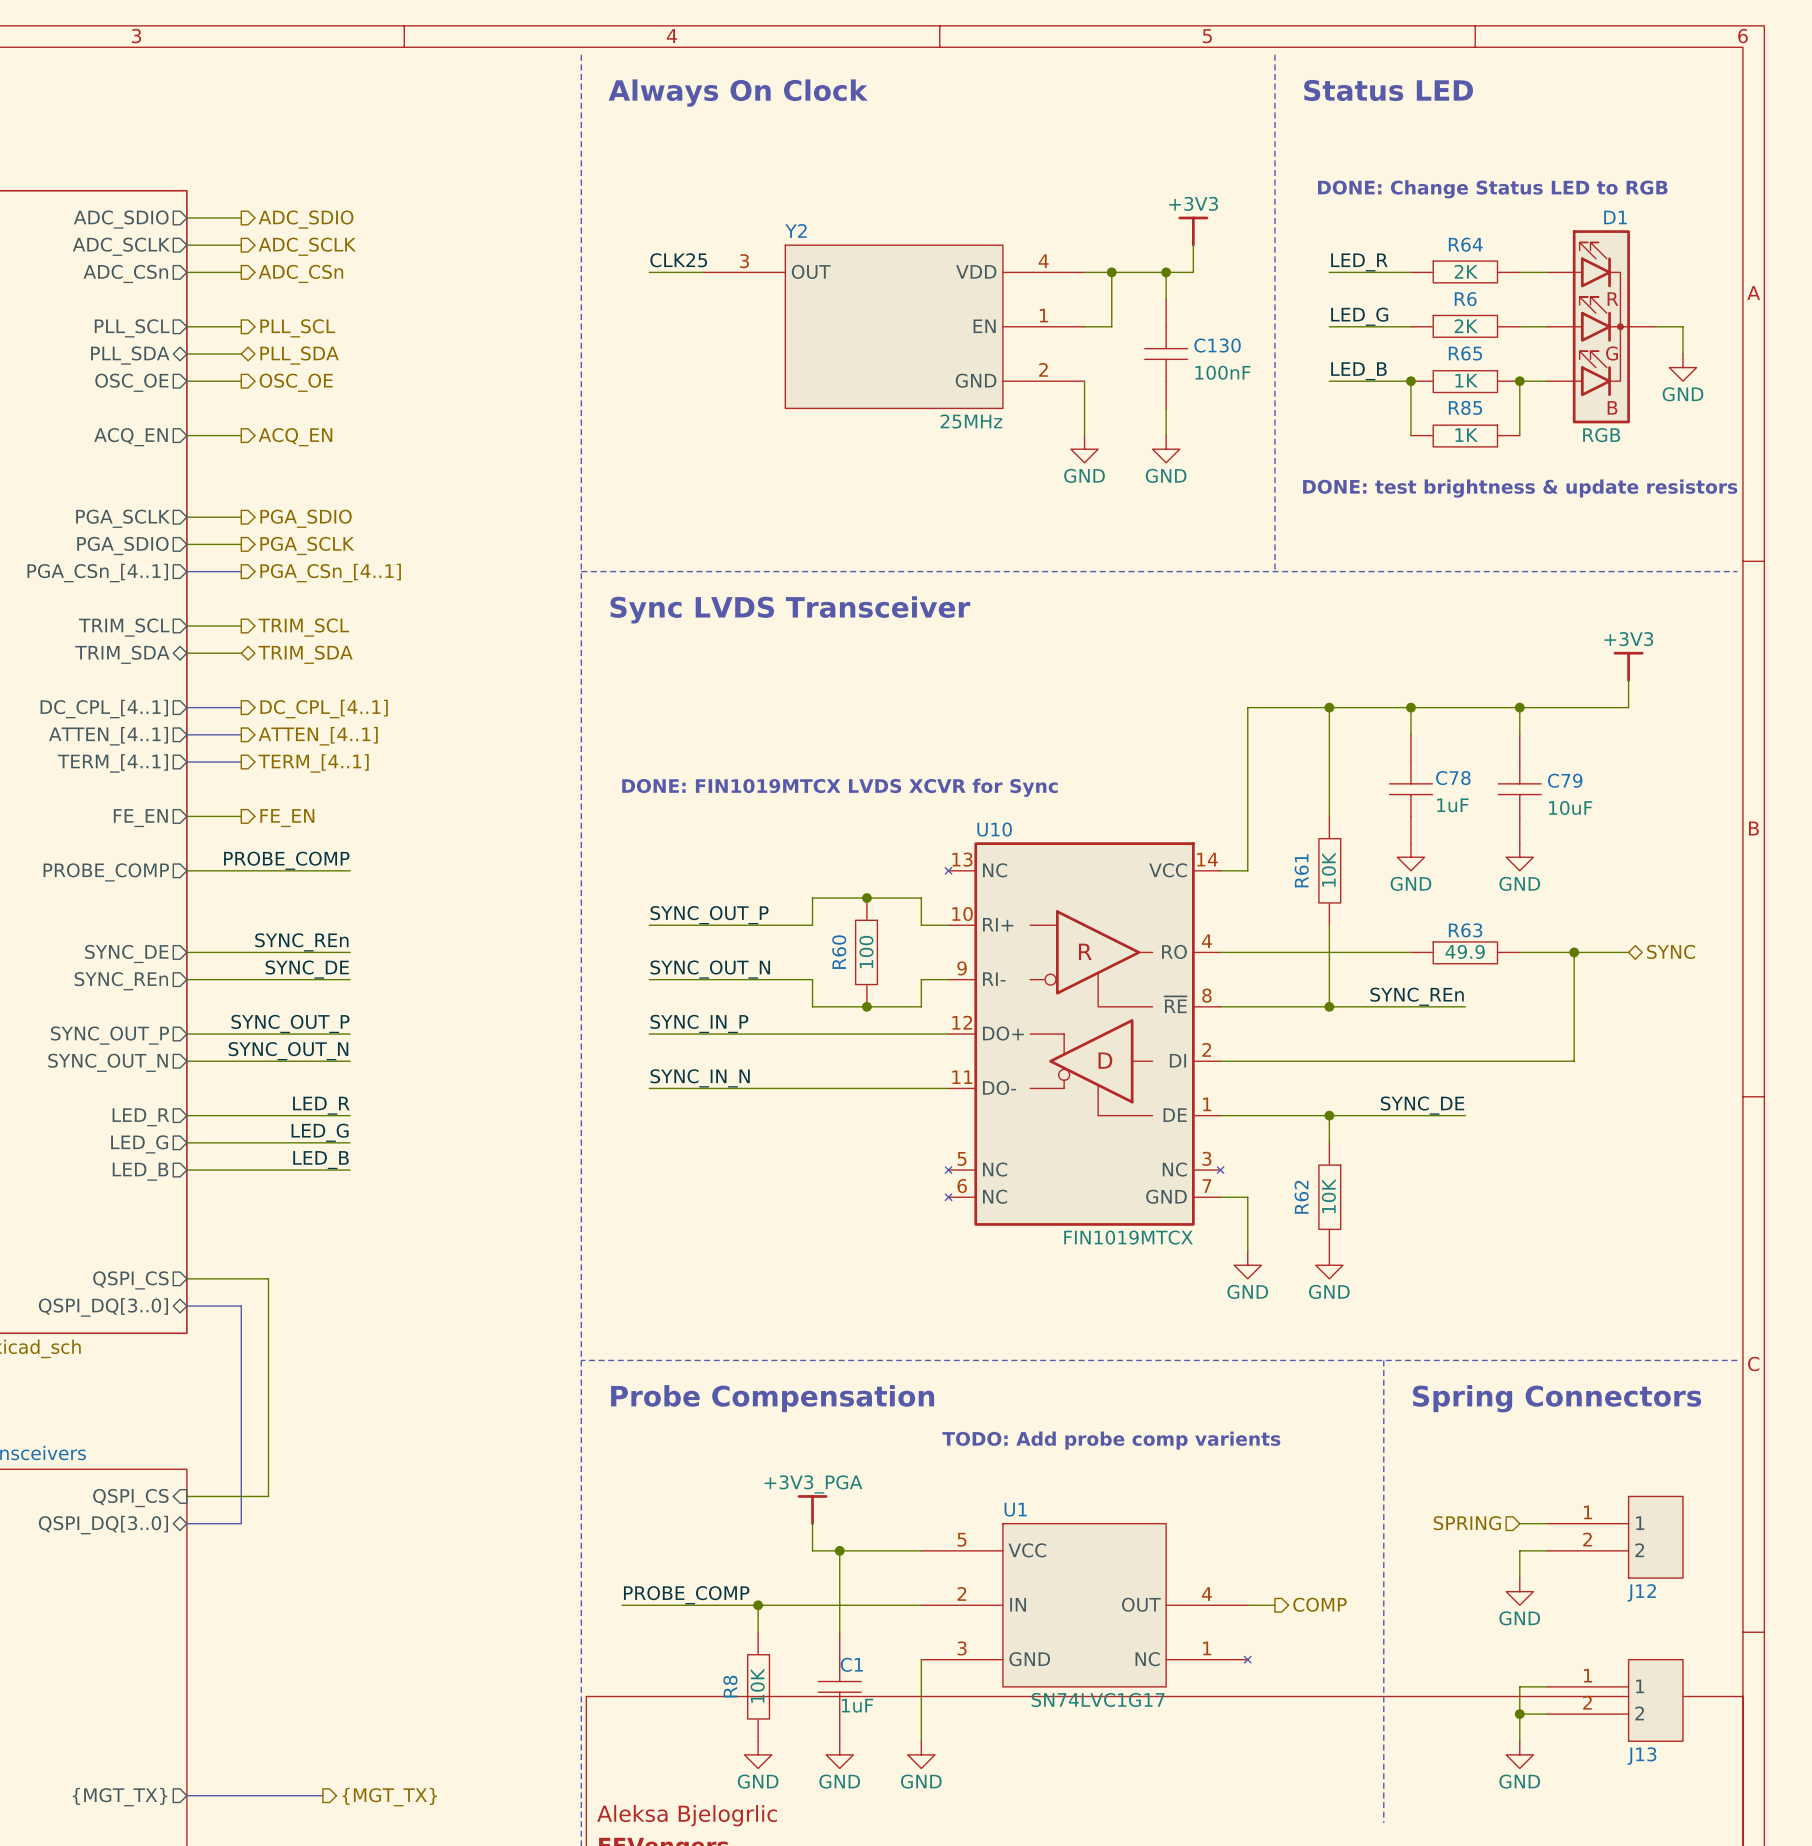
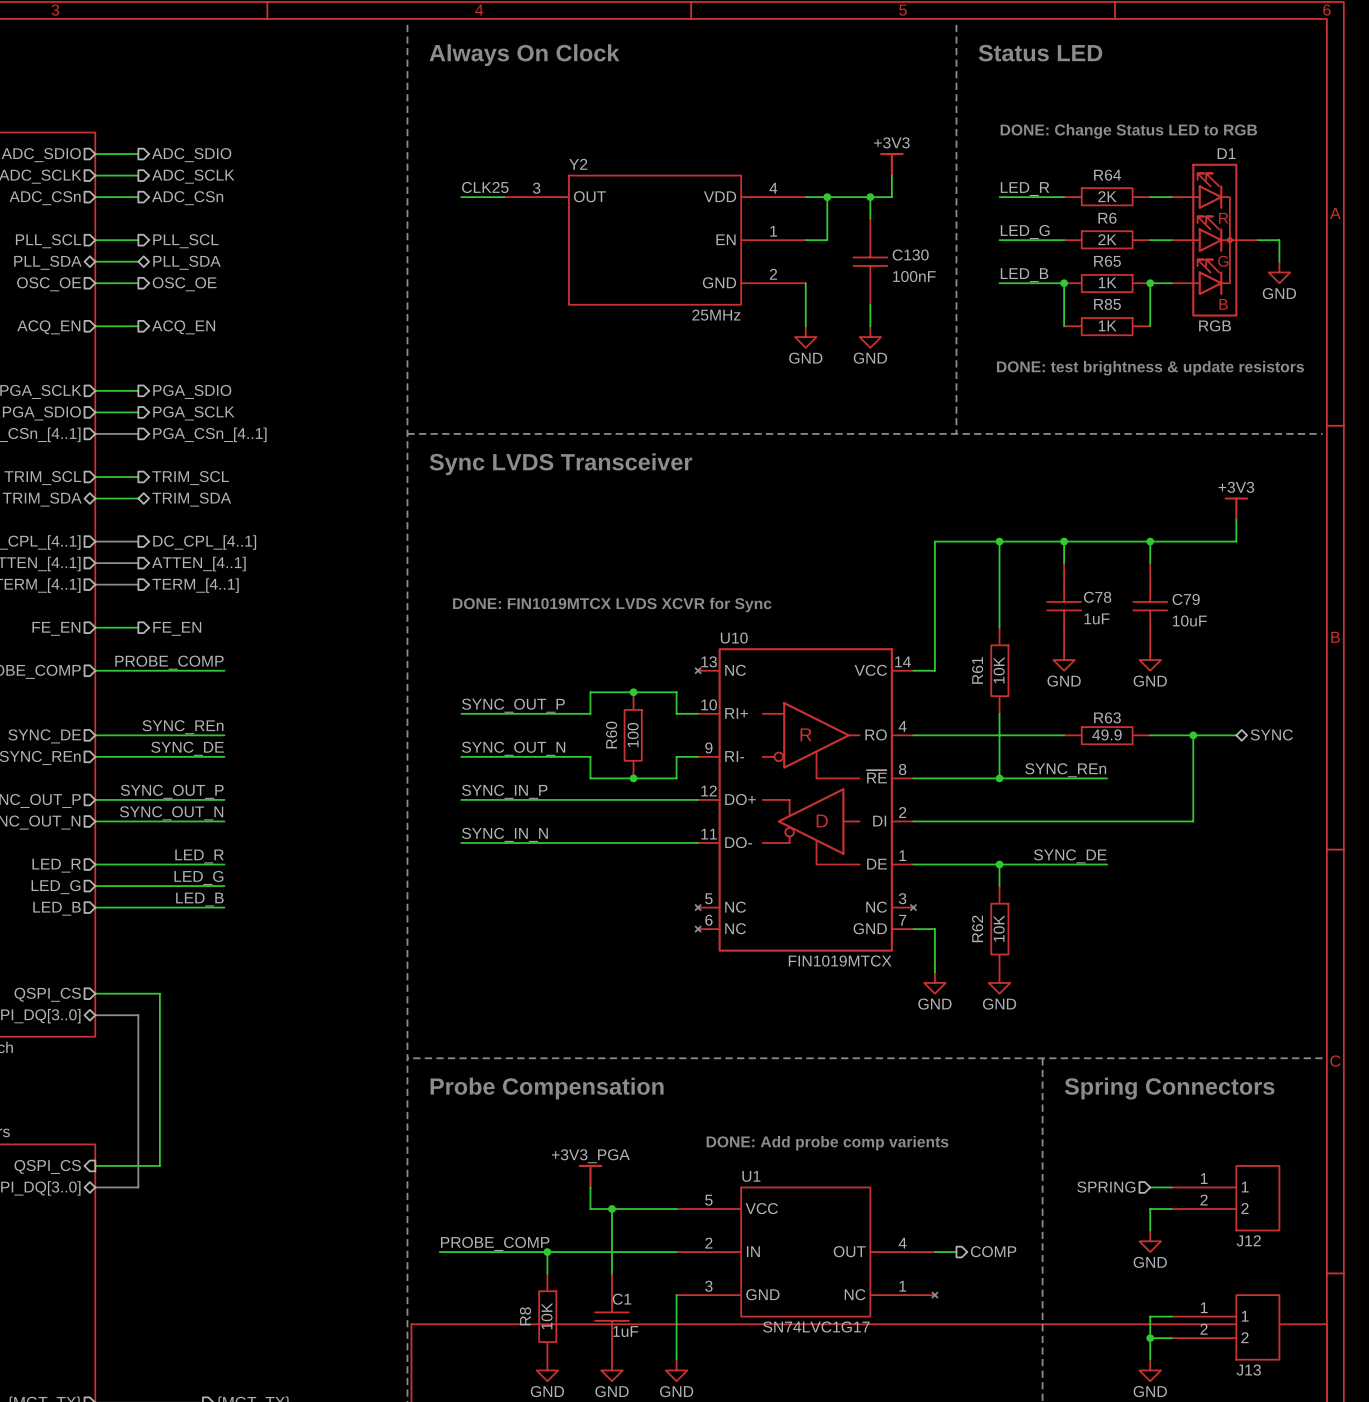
text: TODO: Add probe comp varients (1111, 1440) -> DONE: Add probe comp varients (827, 1143)

